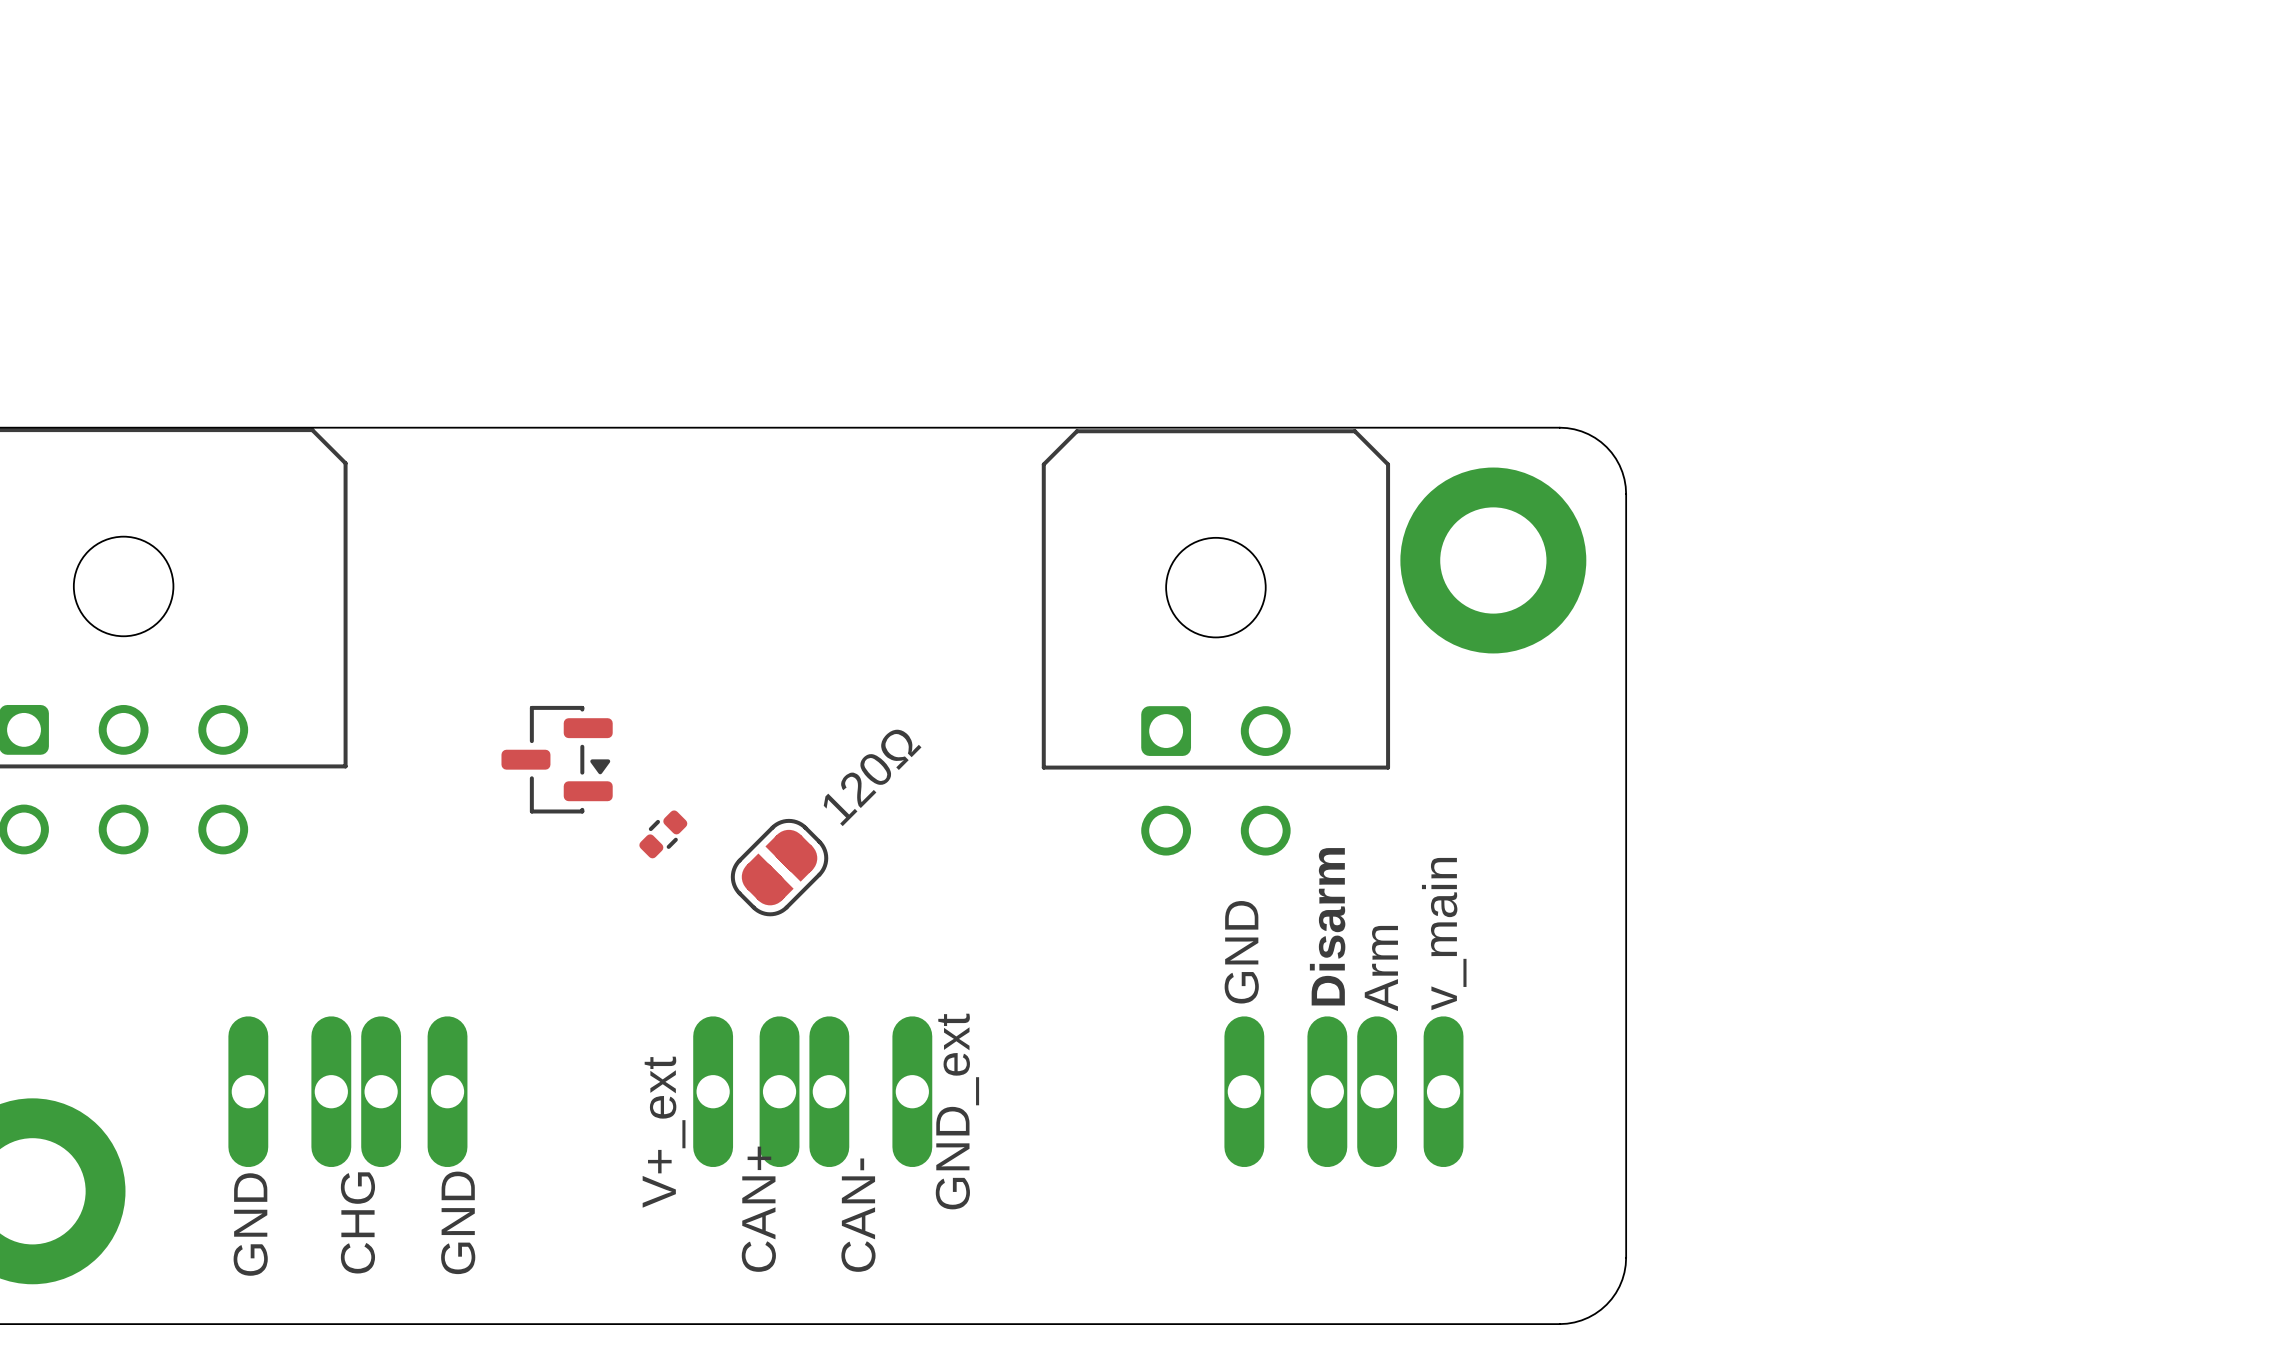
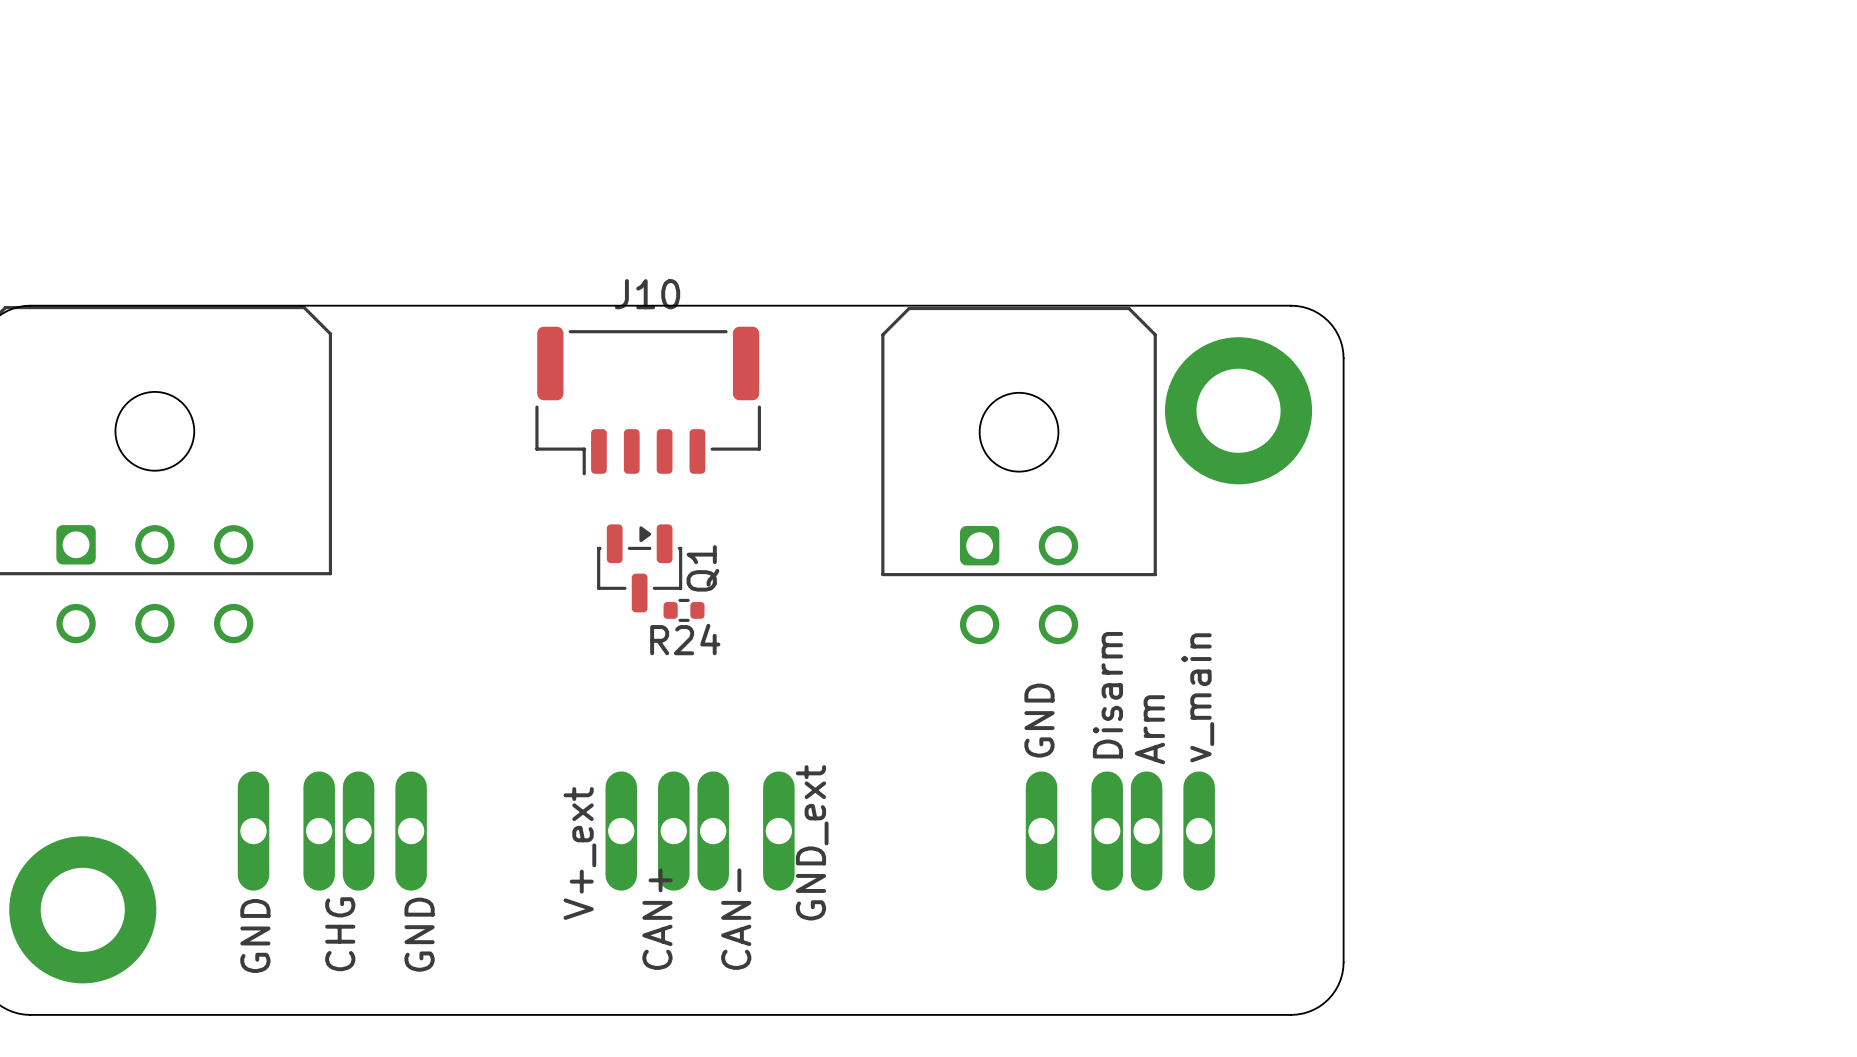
J10: none -> (648, 401)
part: (557, 759) -> none
Q1: none -> (639, 568)
R24: none -> (684, 610)
part: (663, 834) -> none
120Ω: (779, 867) -> none

